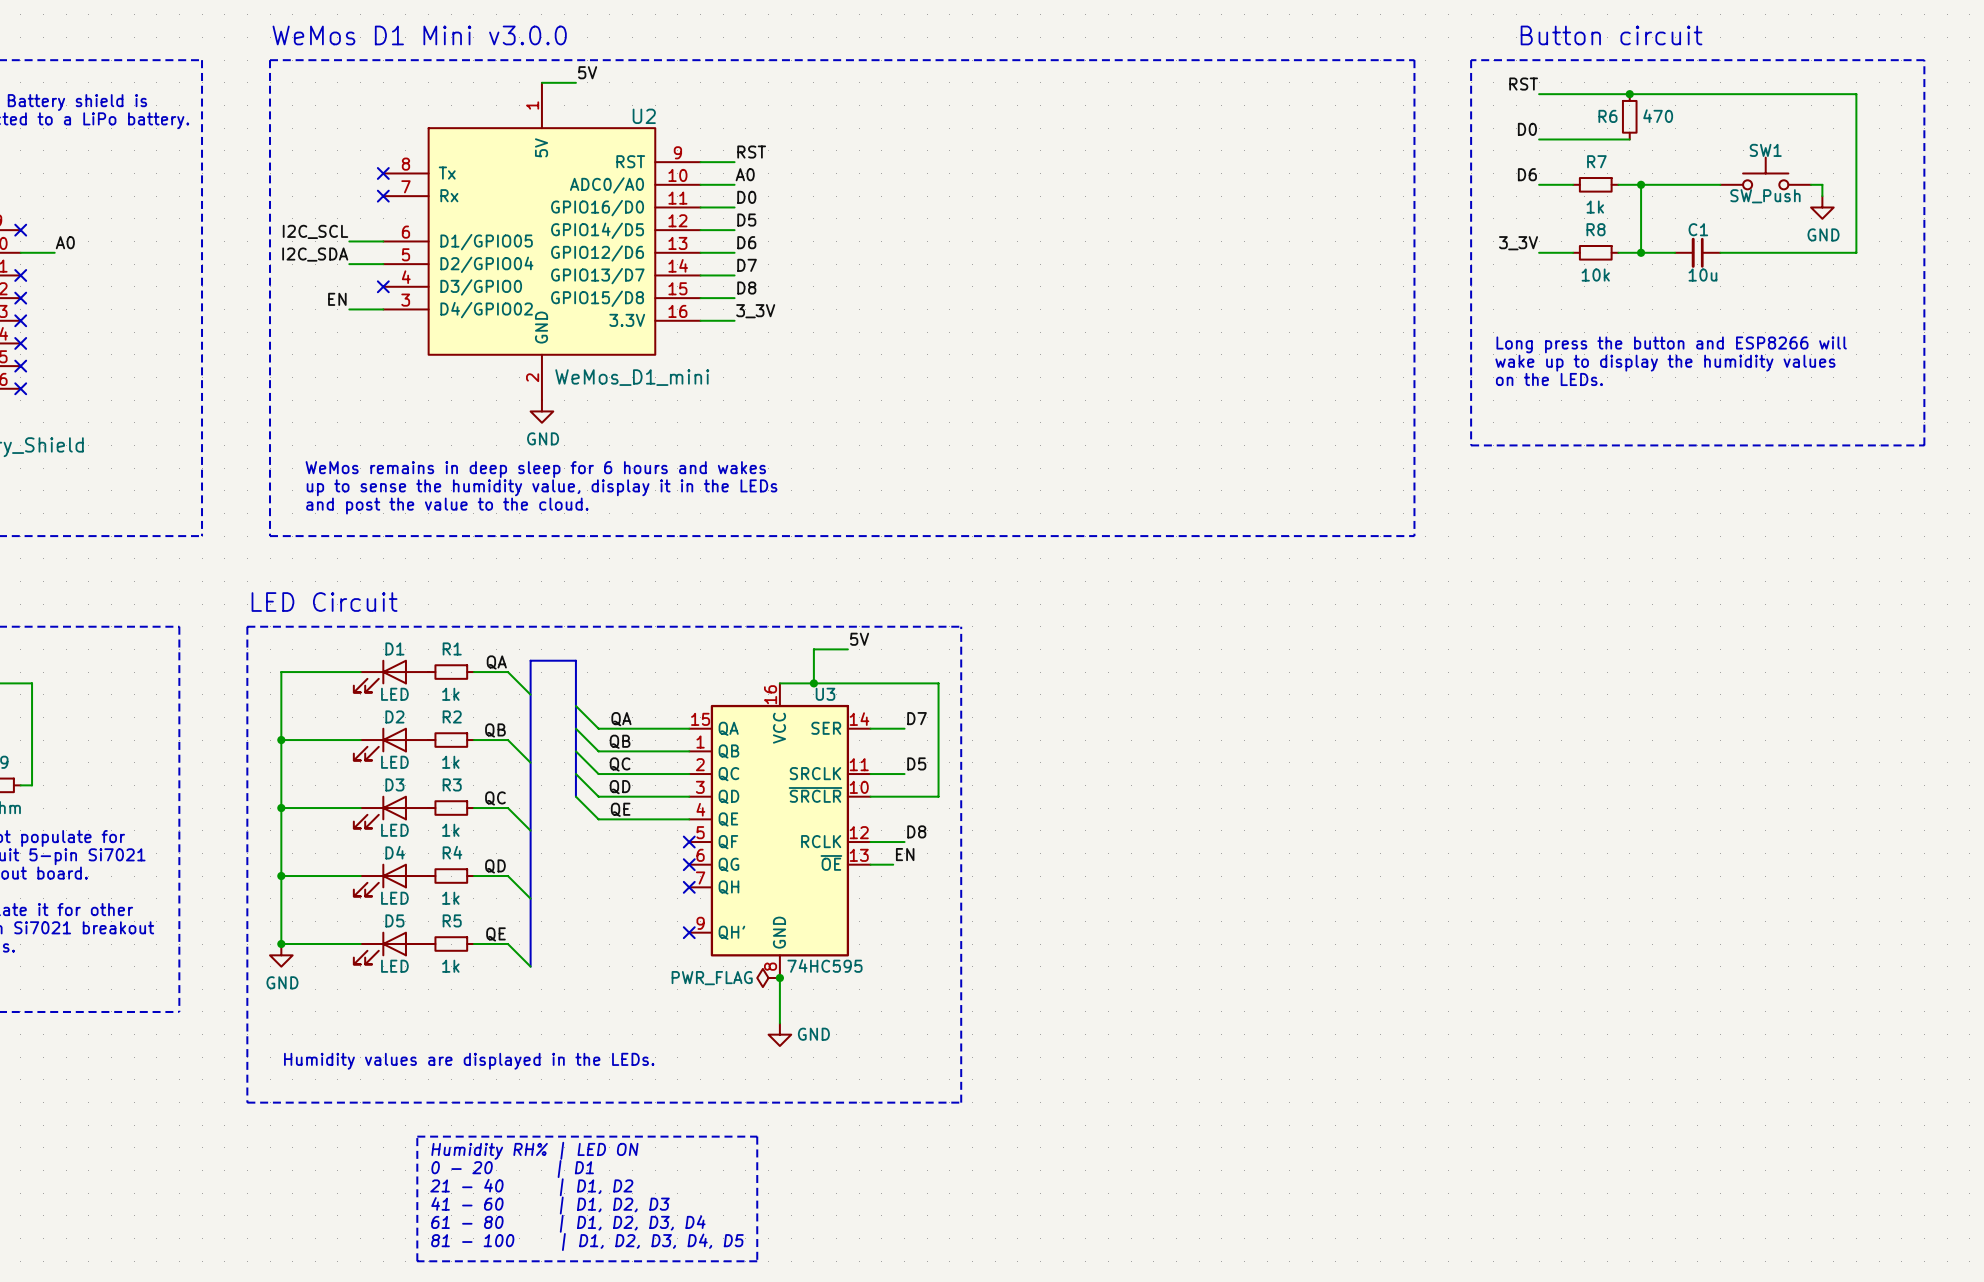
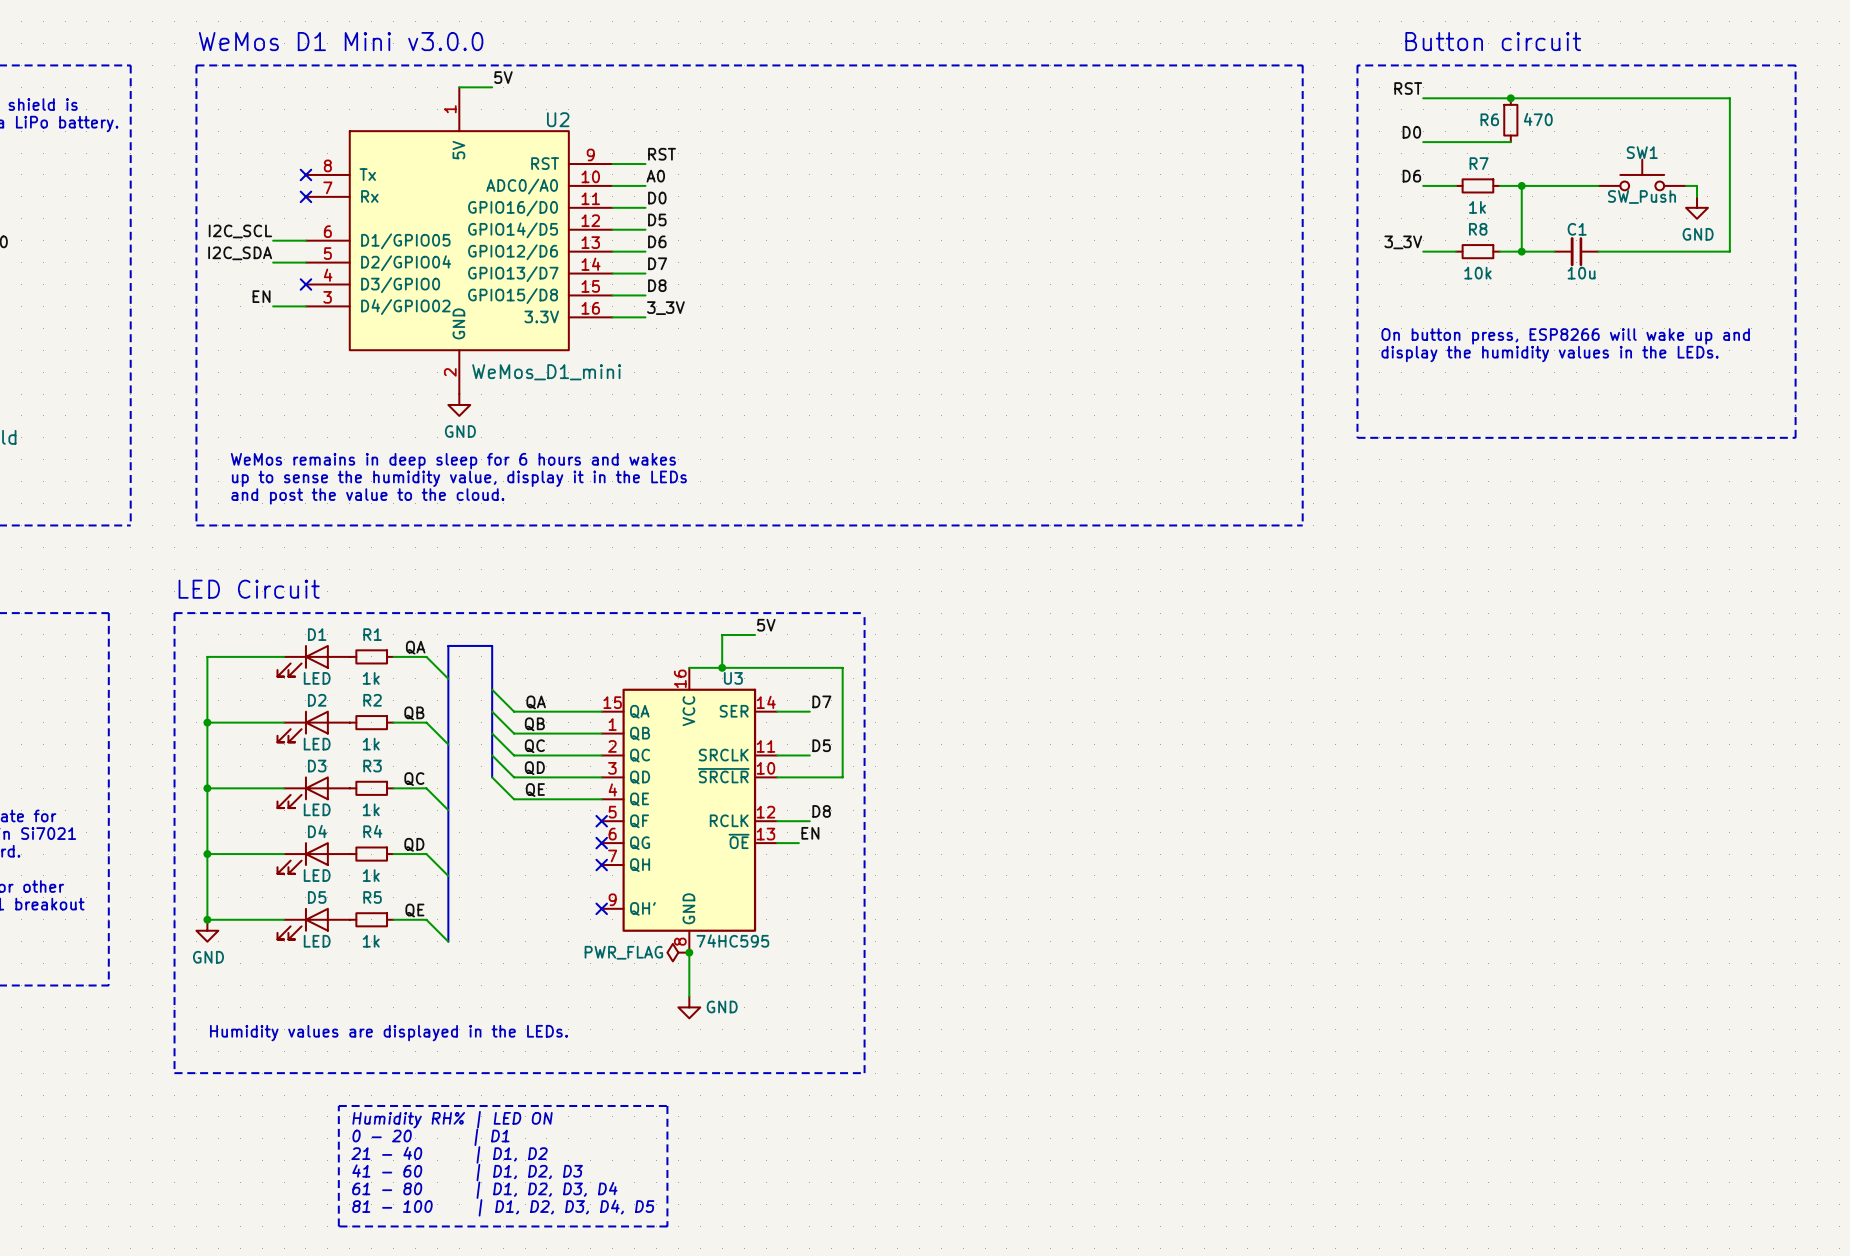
text: Long press the button and ESP8266 will (1671, 344) -> On button press, ESP8266 will wake up and (1565, 336)
text: wake up to display the humidity values (1665, 363) -> display the humidity values in the LEDs. (1550, 354)
text: on the LEDs. (1549, 379) -> none

